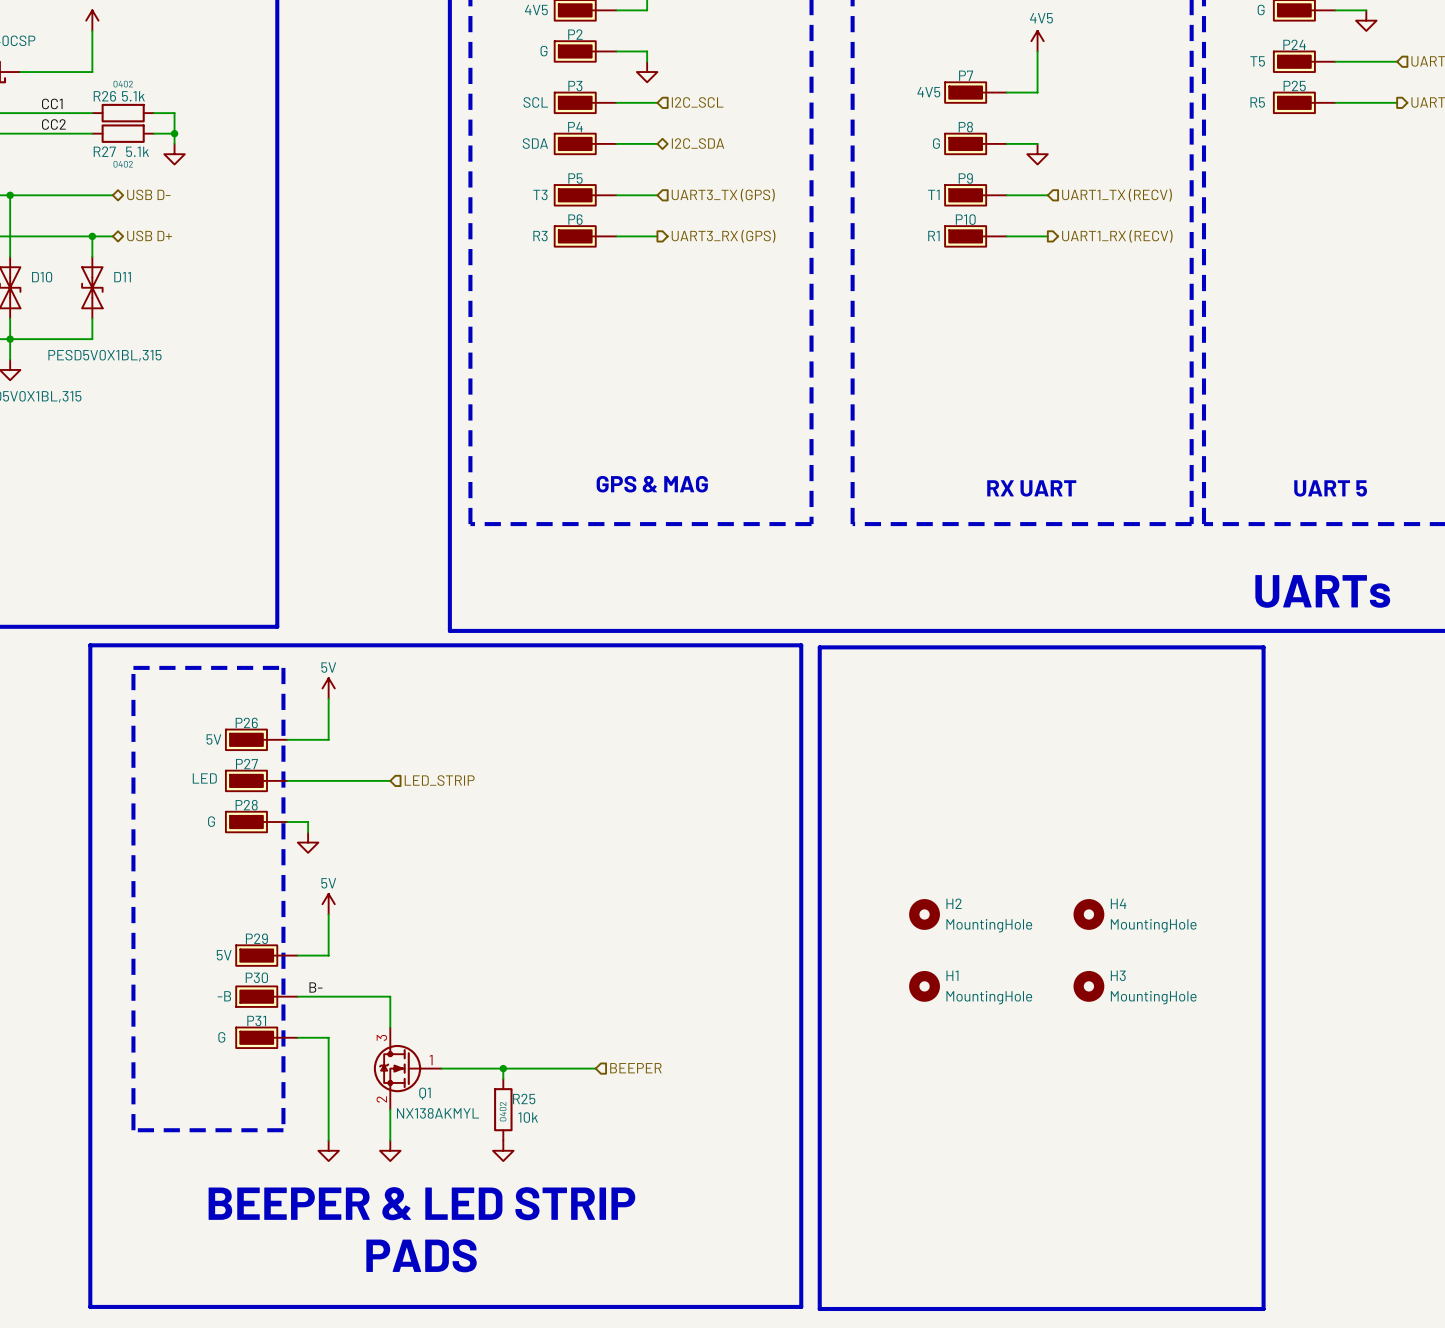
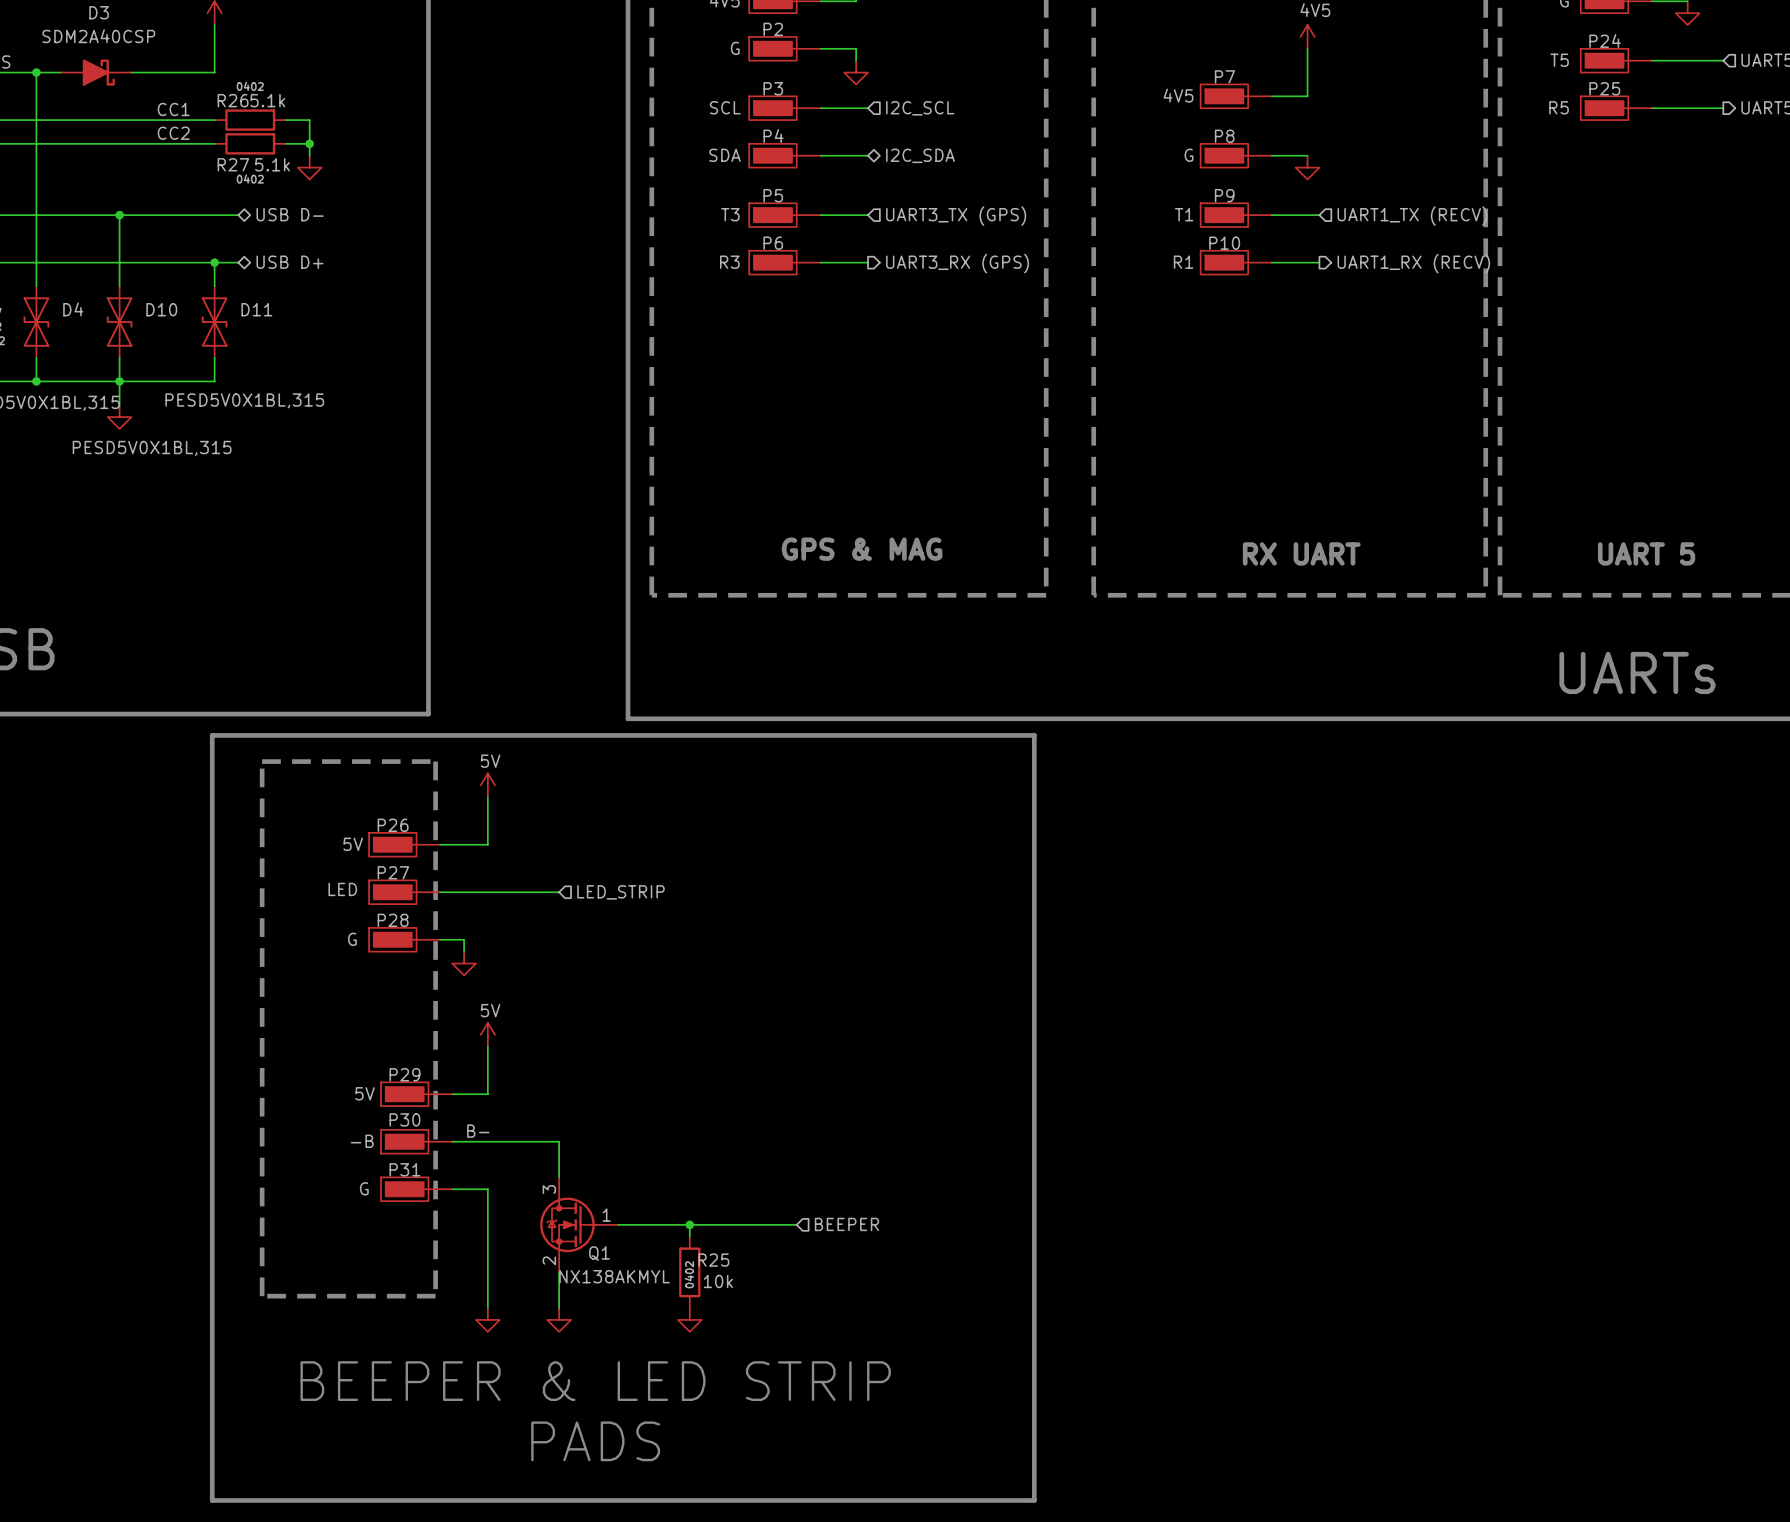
line: (819, 647) (1263, 647) (1263, 1309) (819, 1309) (819, 647) -> none
H2: MountingHole (924, 914) -> none
H4: MountingHole (1088, 914) -> none
H1: MountingHole (924, 986) -> none
H3: MountingHole (1088, 986) -> none

